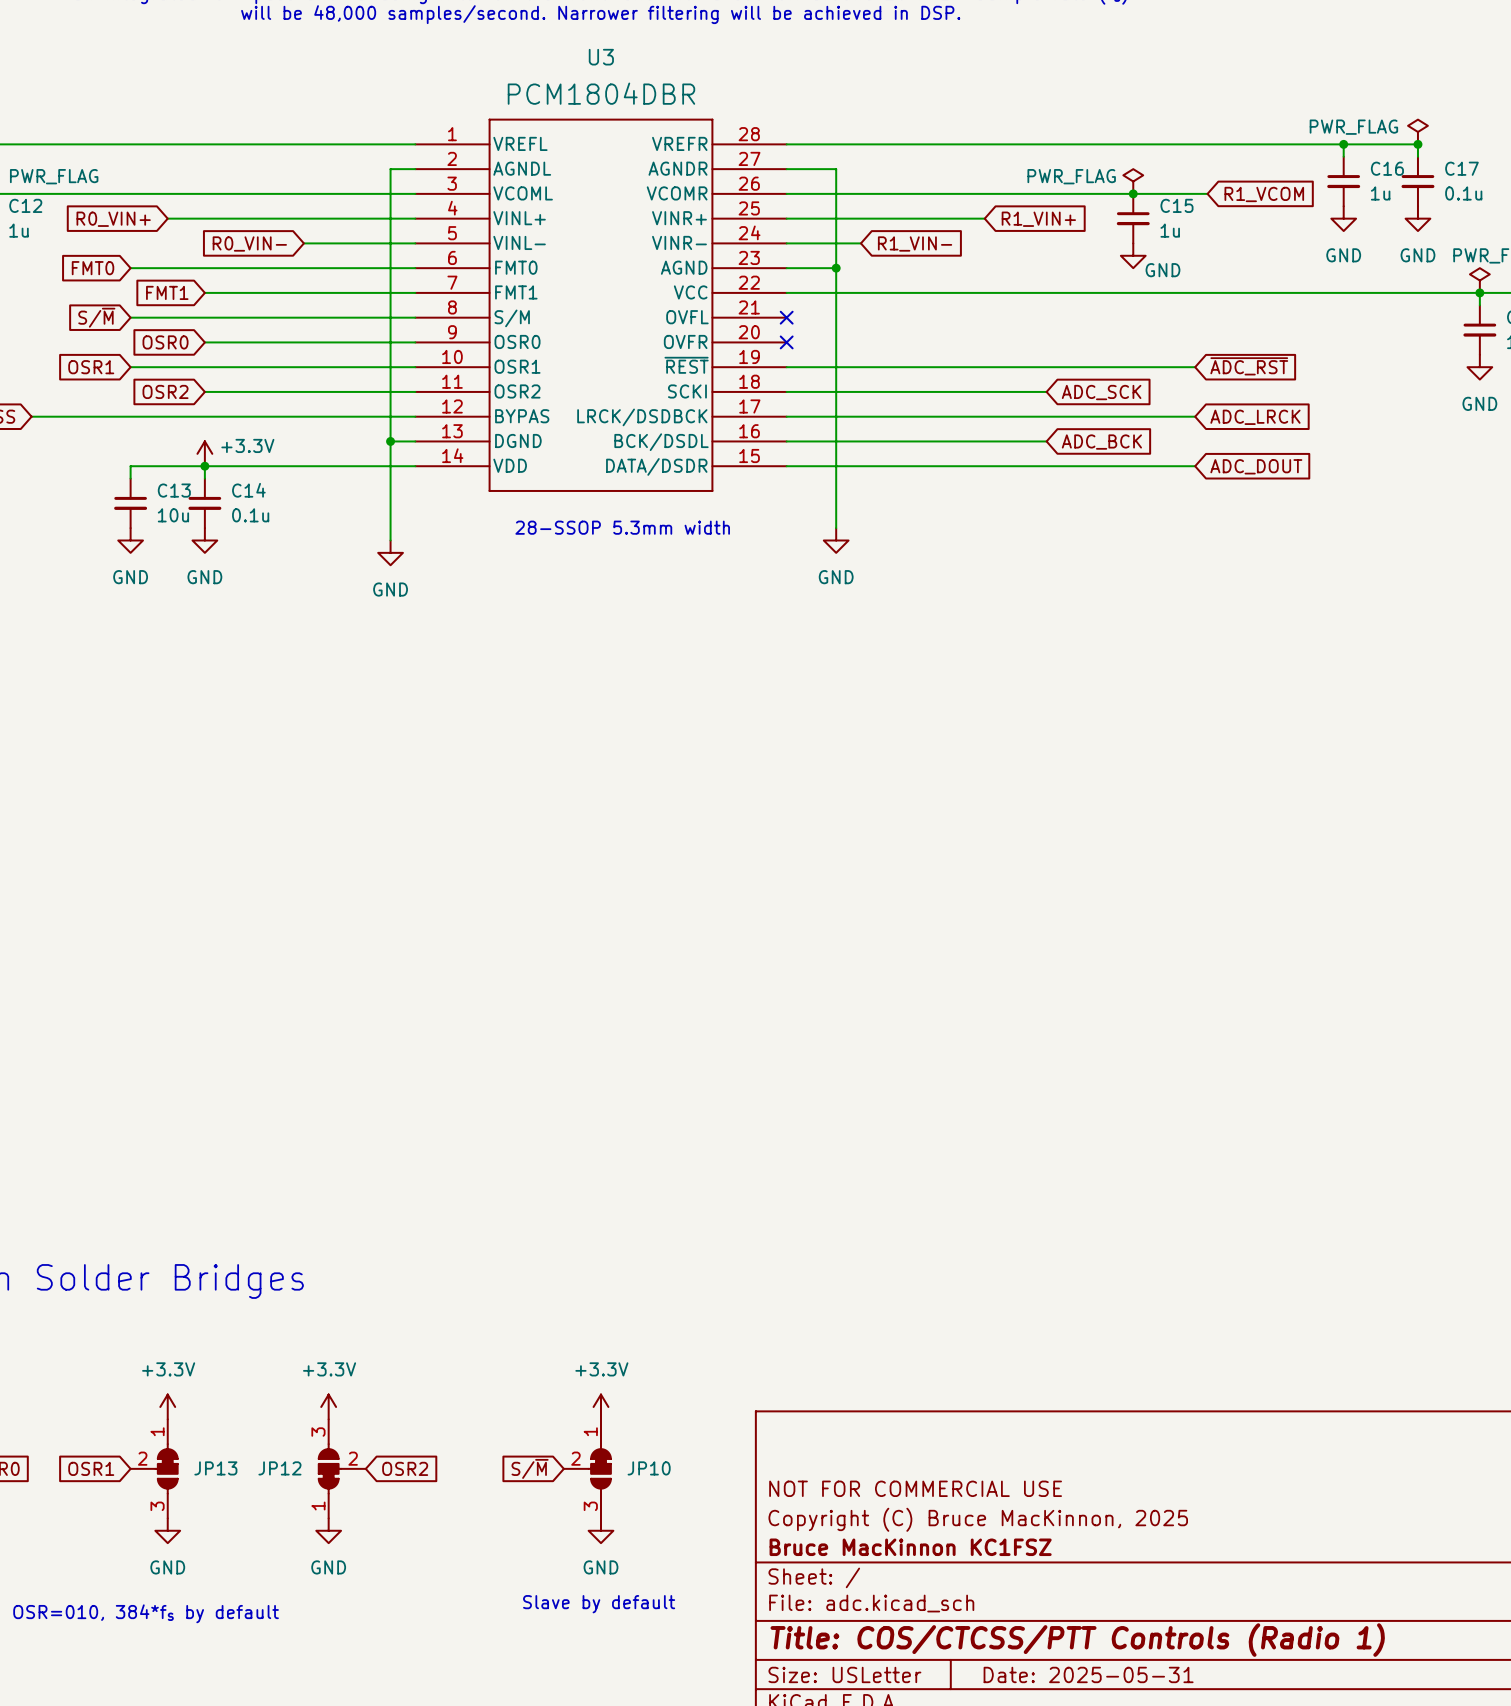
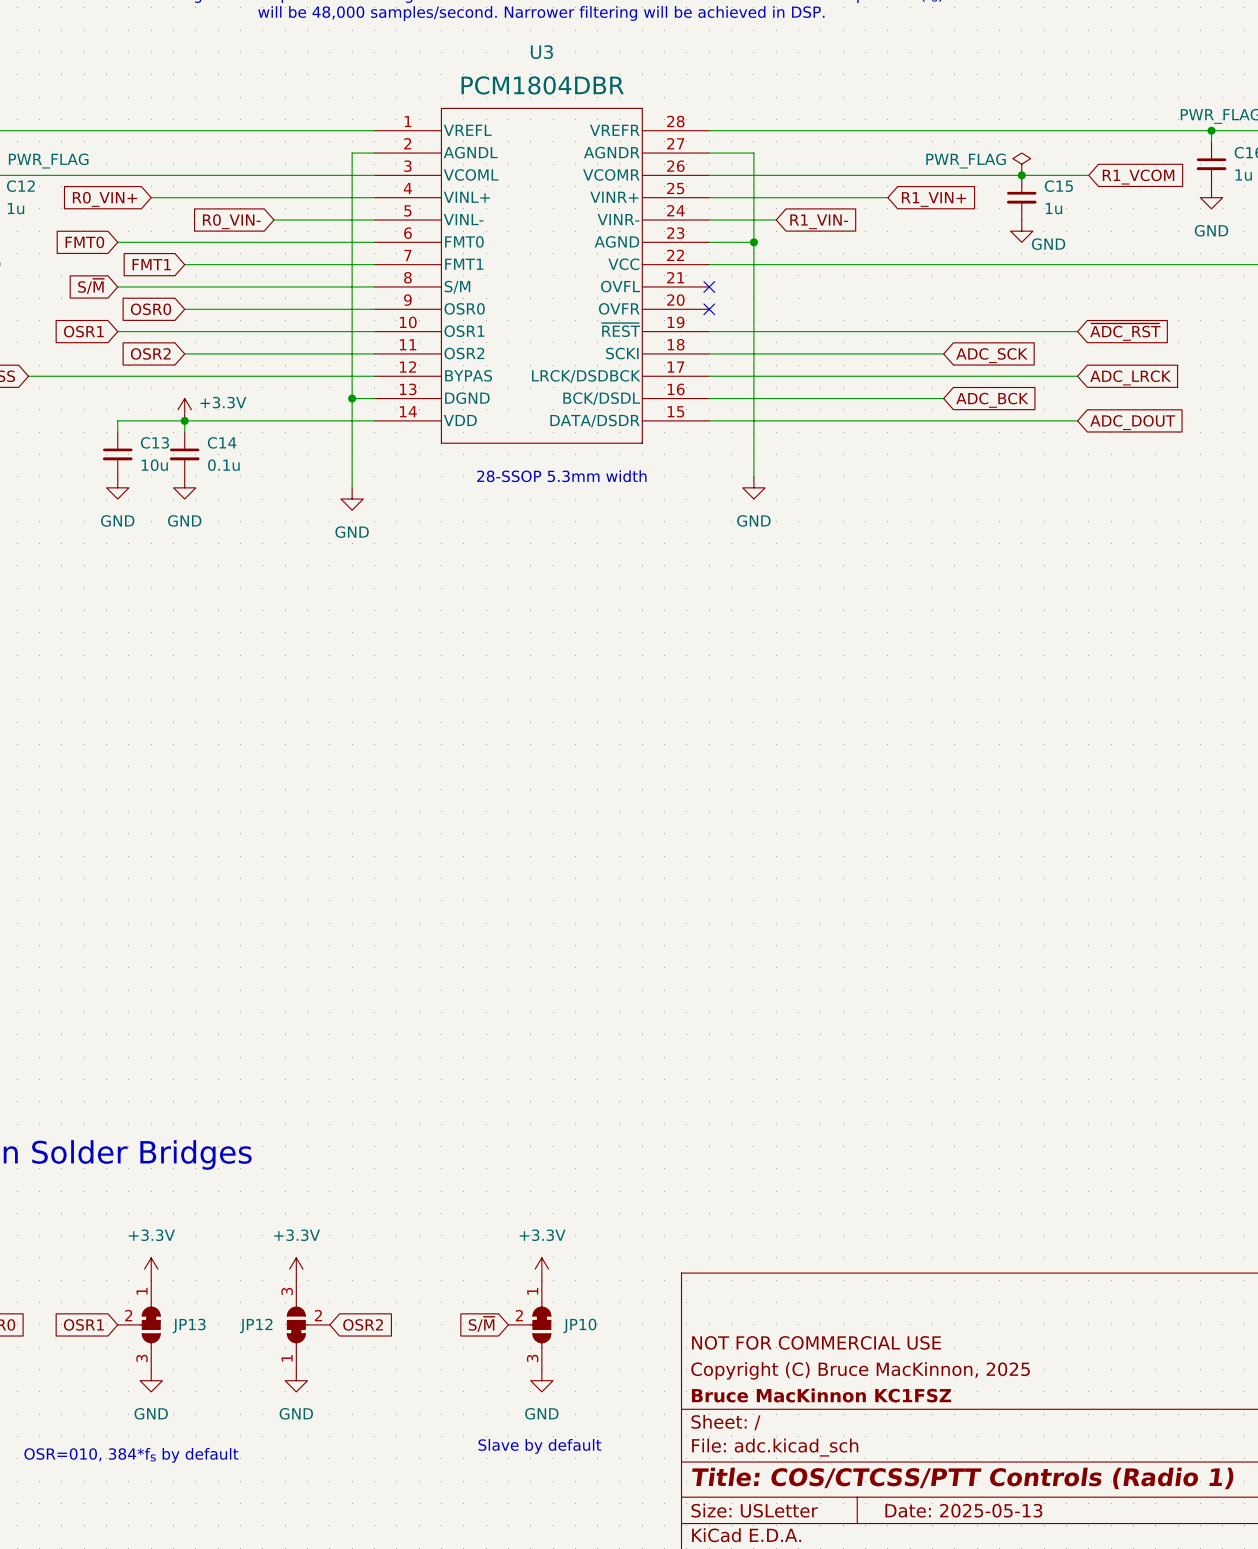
title block: Date: 2025-05-31 (1088, 1674) -> Date: 2025-05-13 (963, 1510)

